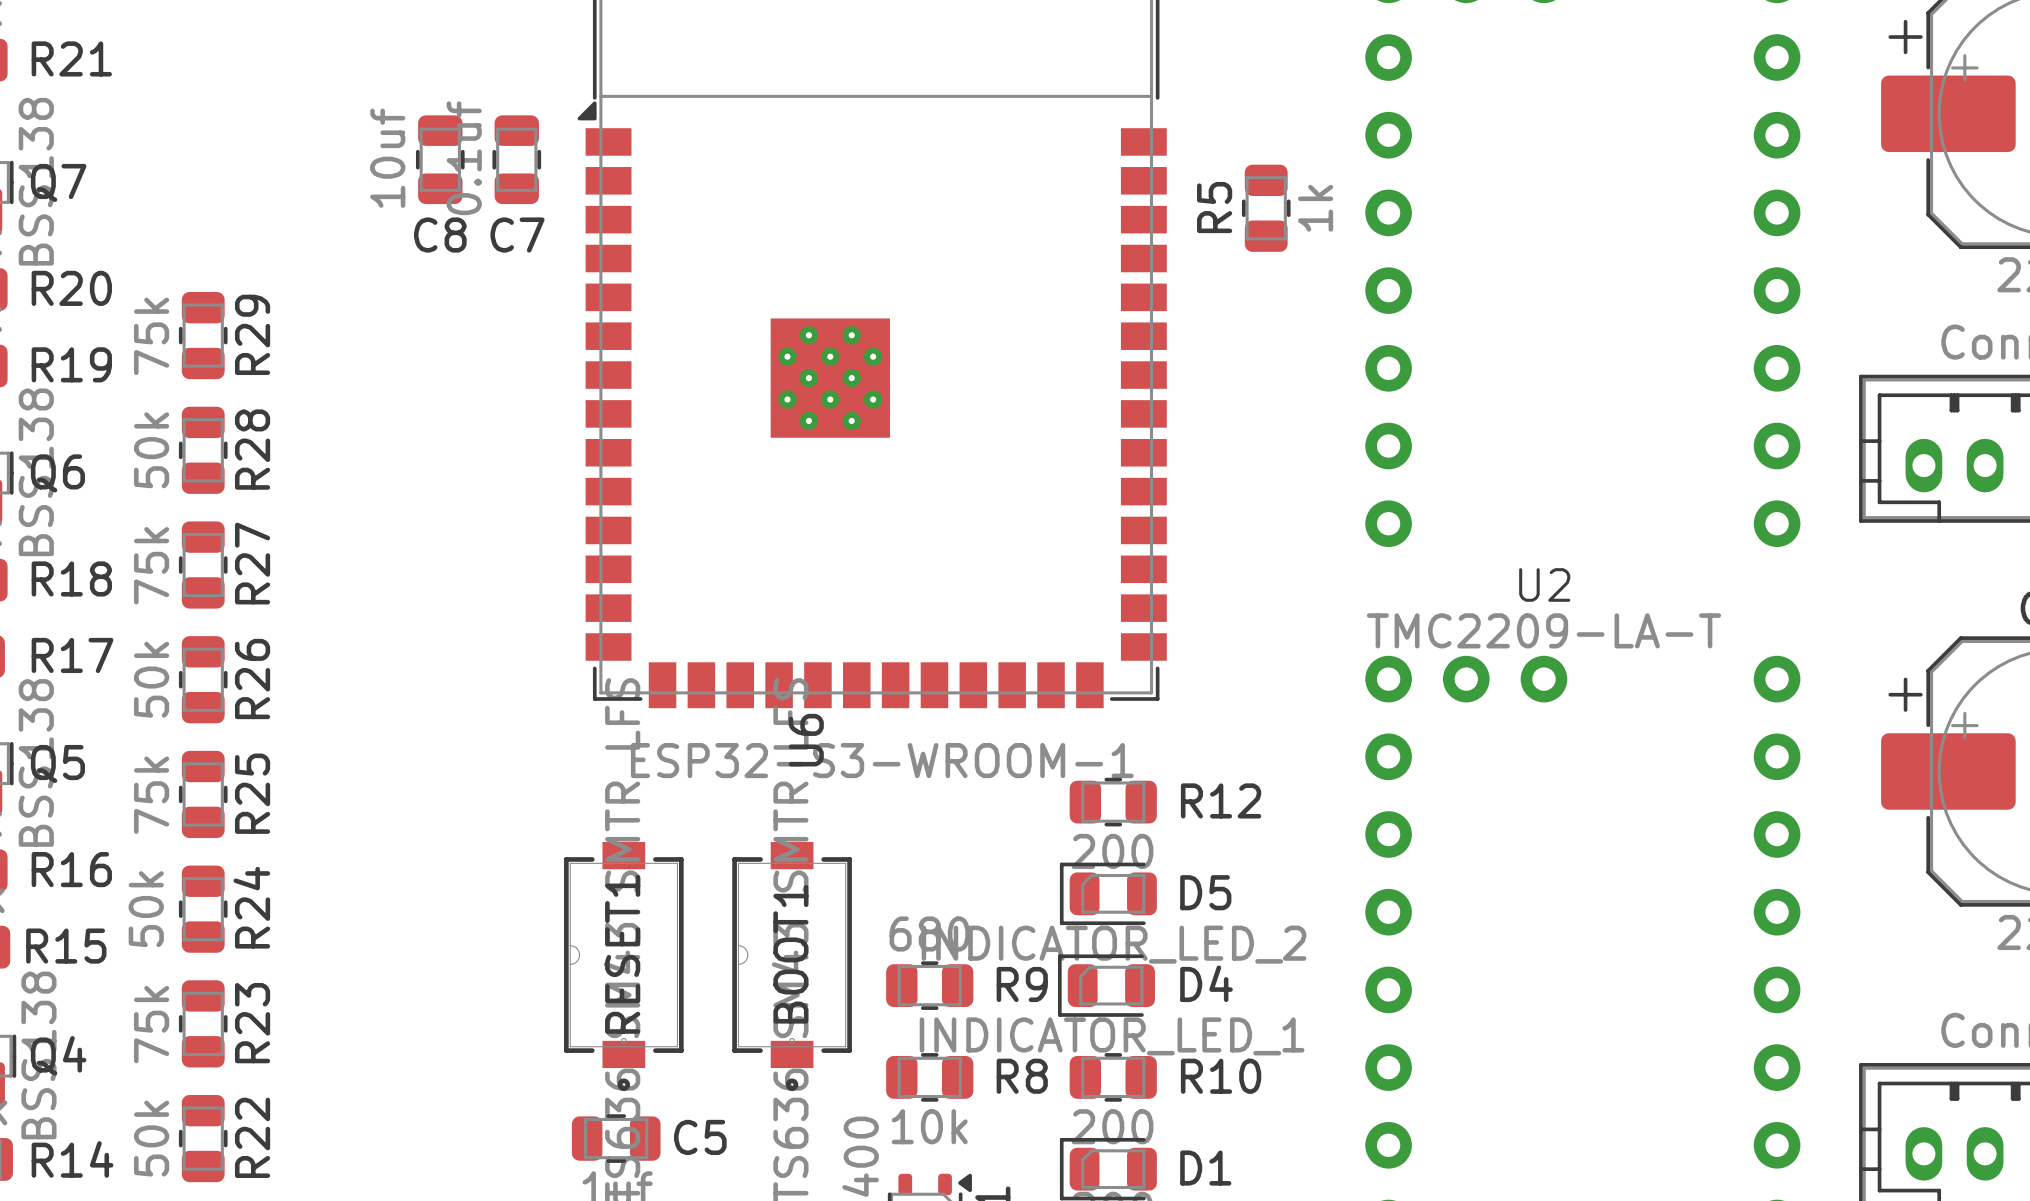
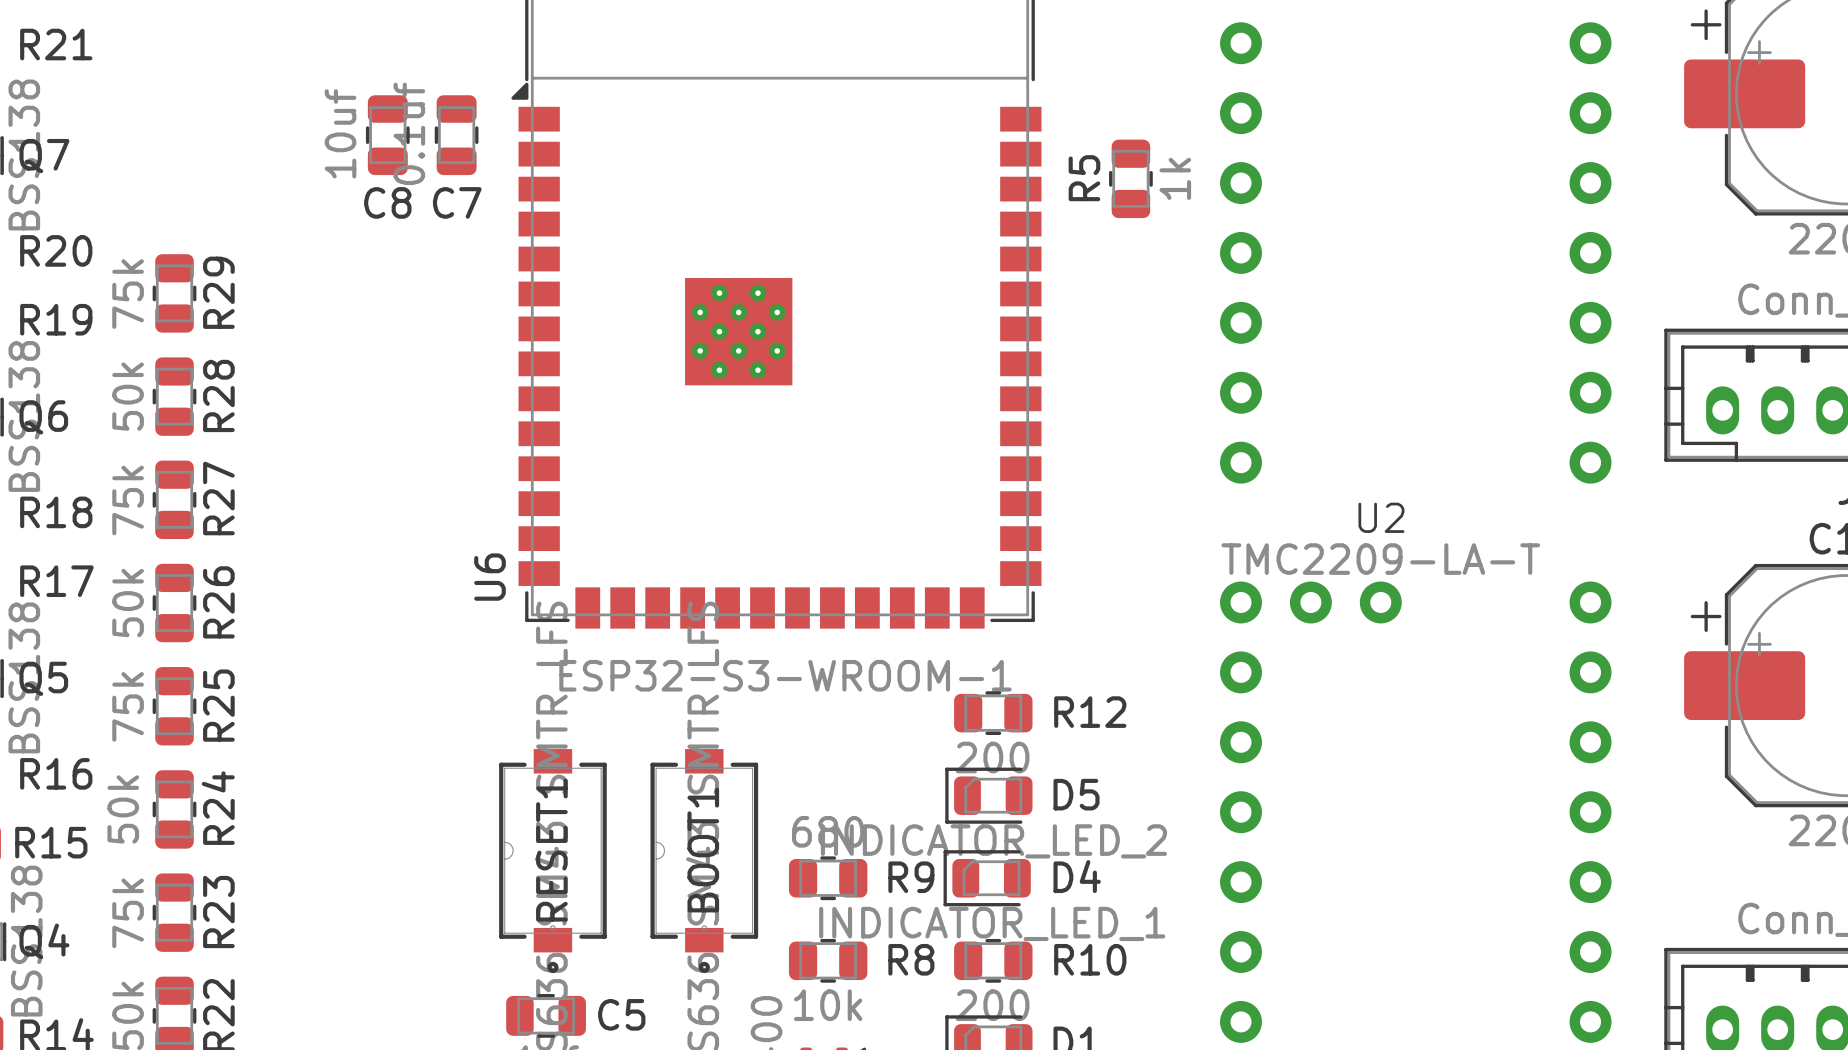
U6 name position: U6 (806, 740) -> U6 (489, 577)

